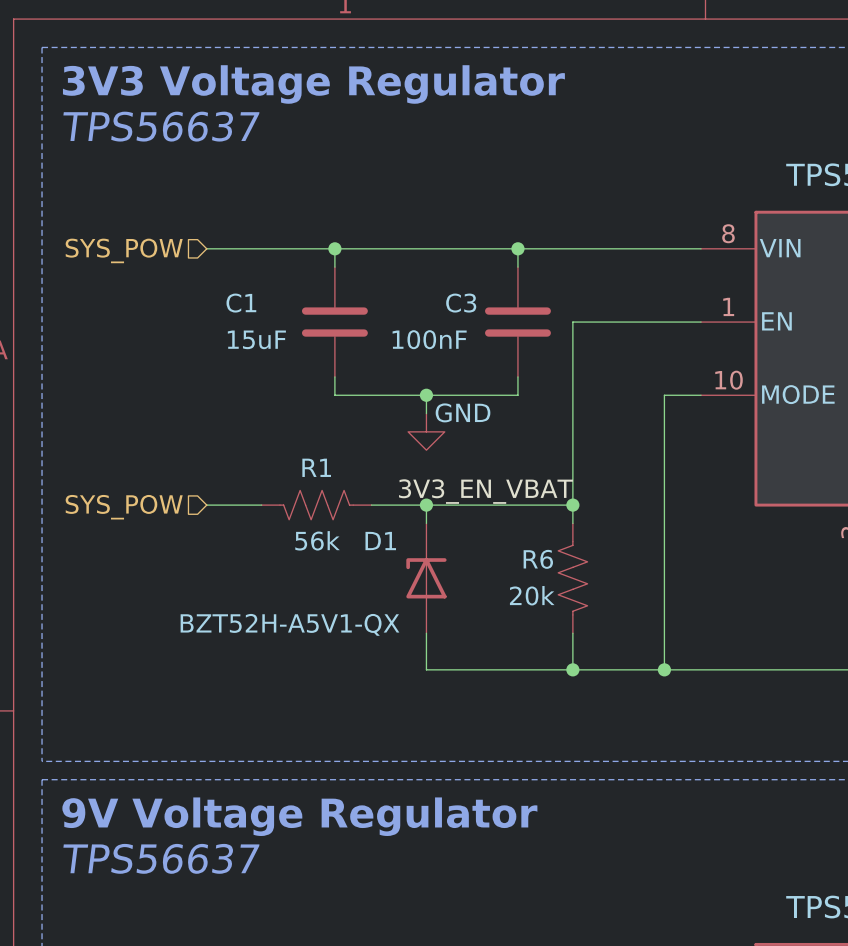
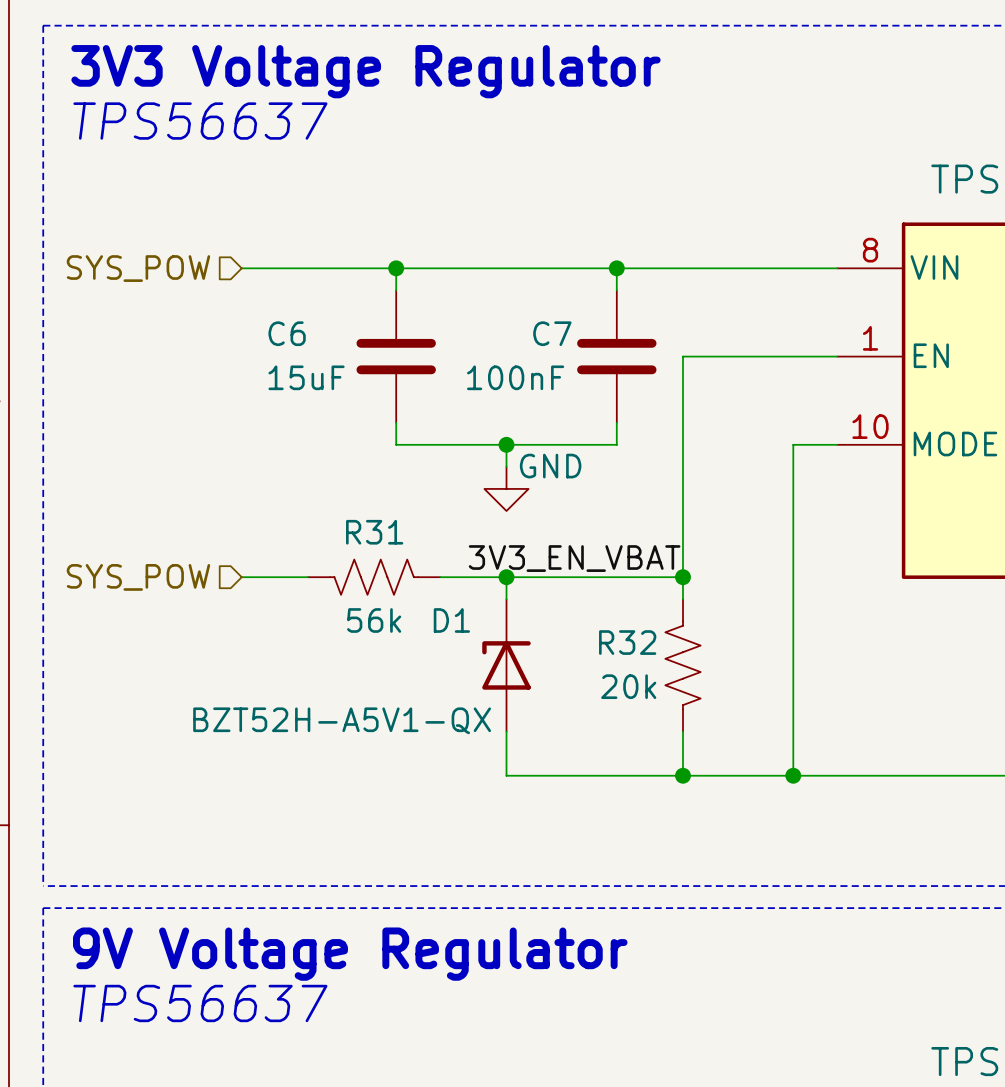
C1 name: C1 (241, 303) -> C6 (287, 333)
C3 name: C3 (461, 303) -> C7 (552, 333)
R1 name: R1 (316, 467) -> R31 (374, 532)
R6 name: R6 (538, 559) -> R32 (627, 642)

